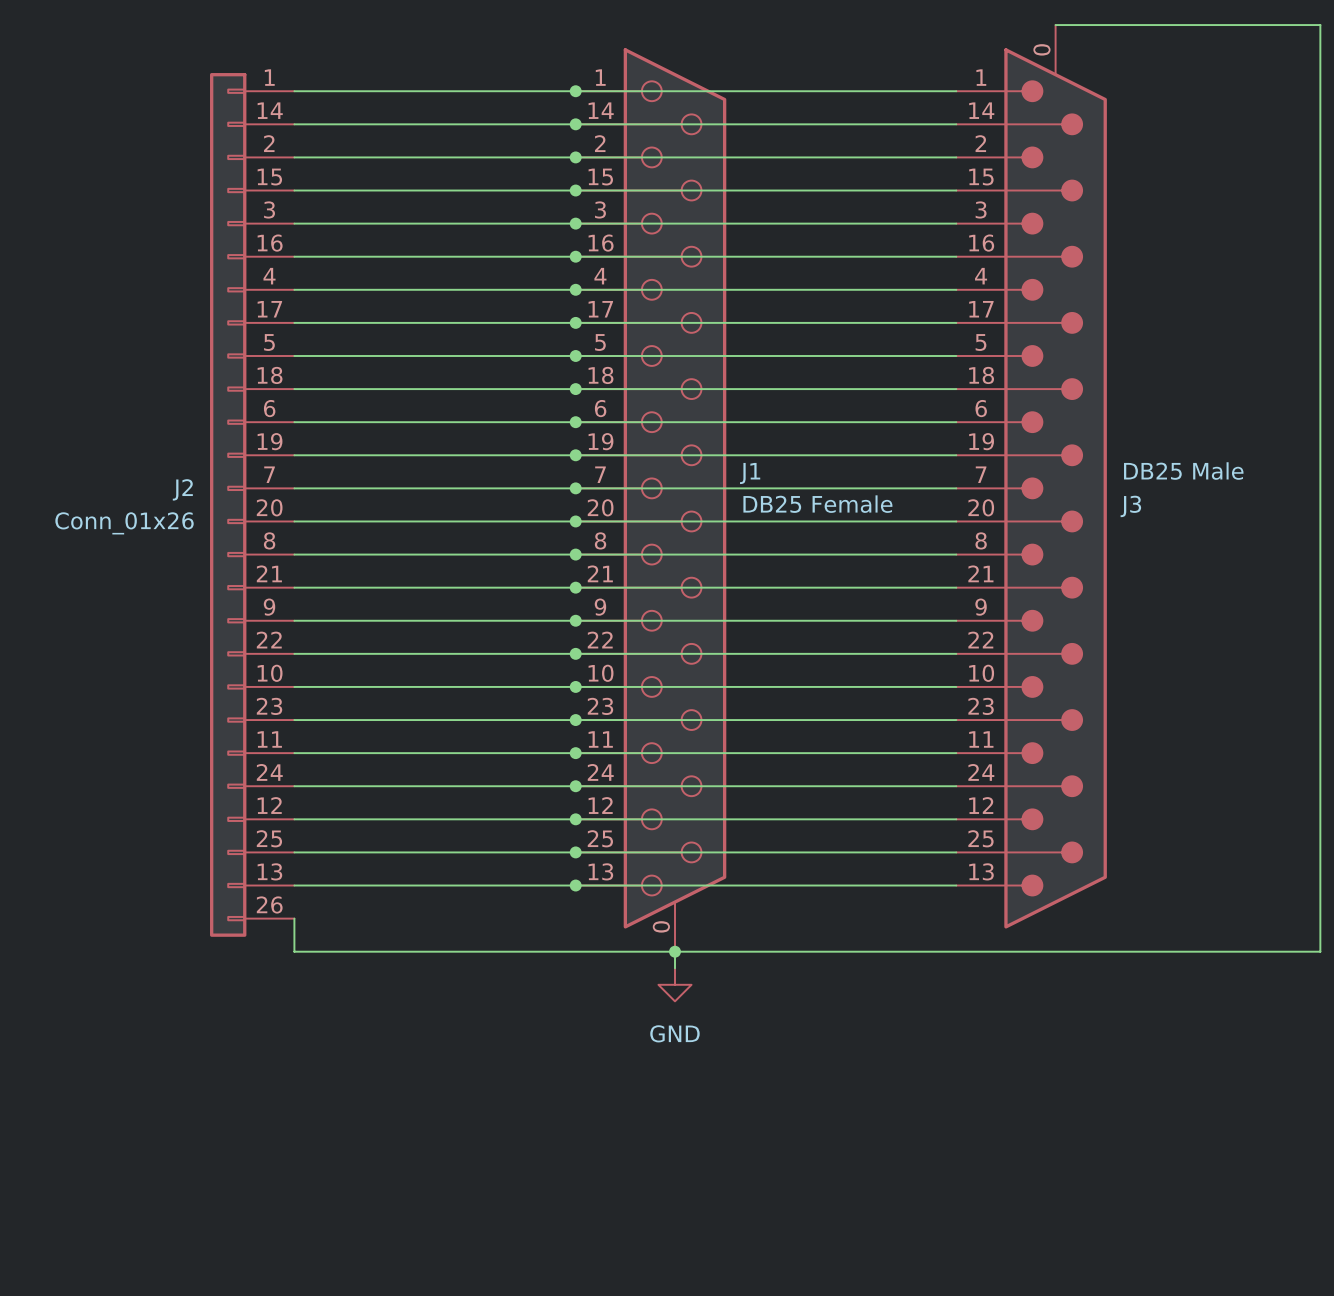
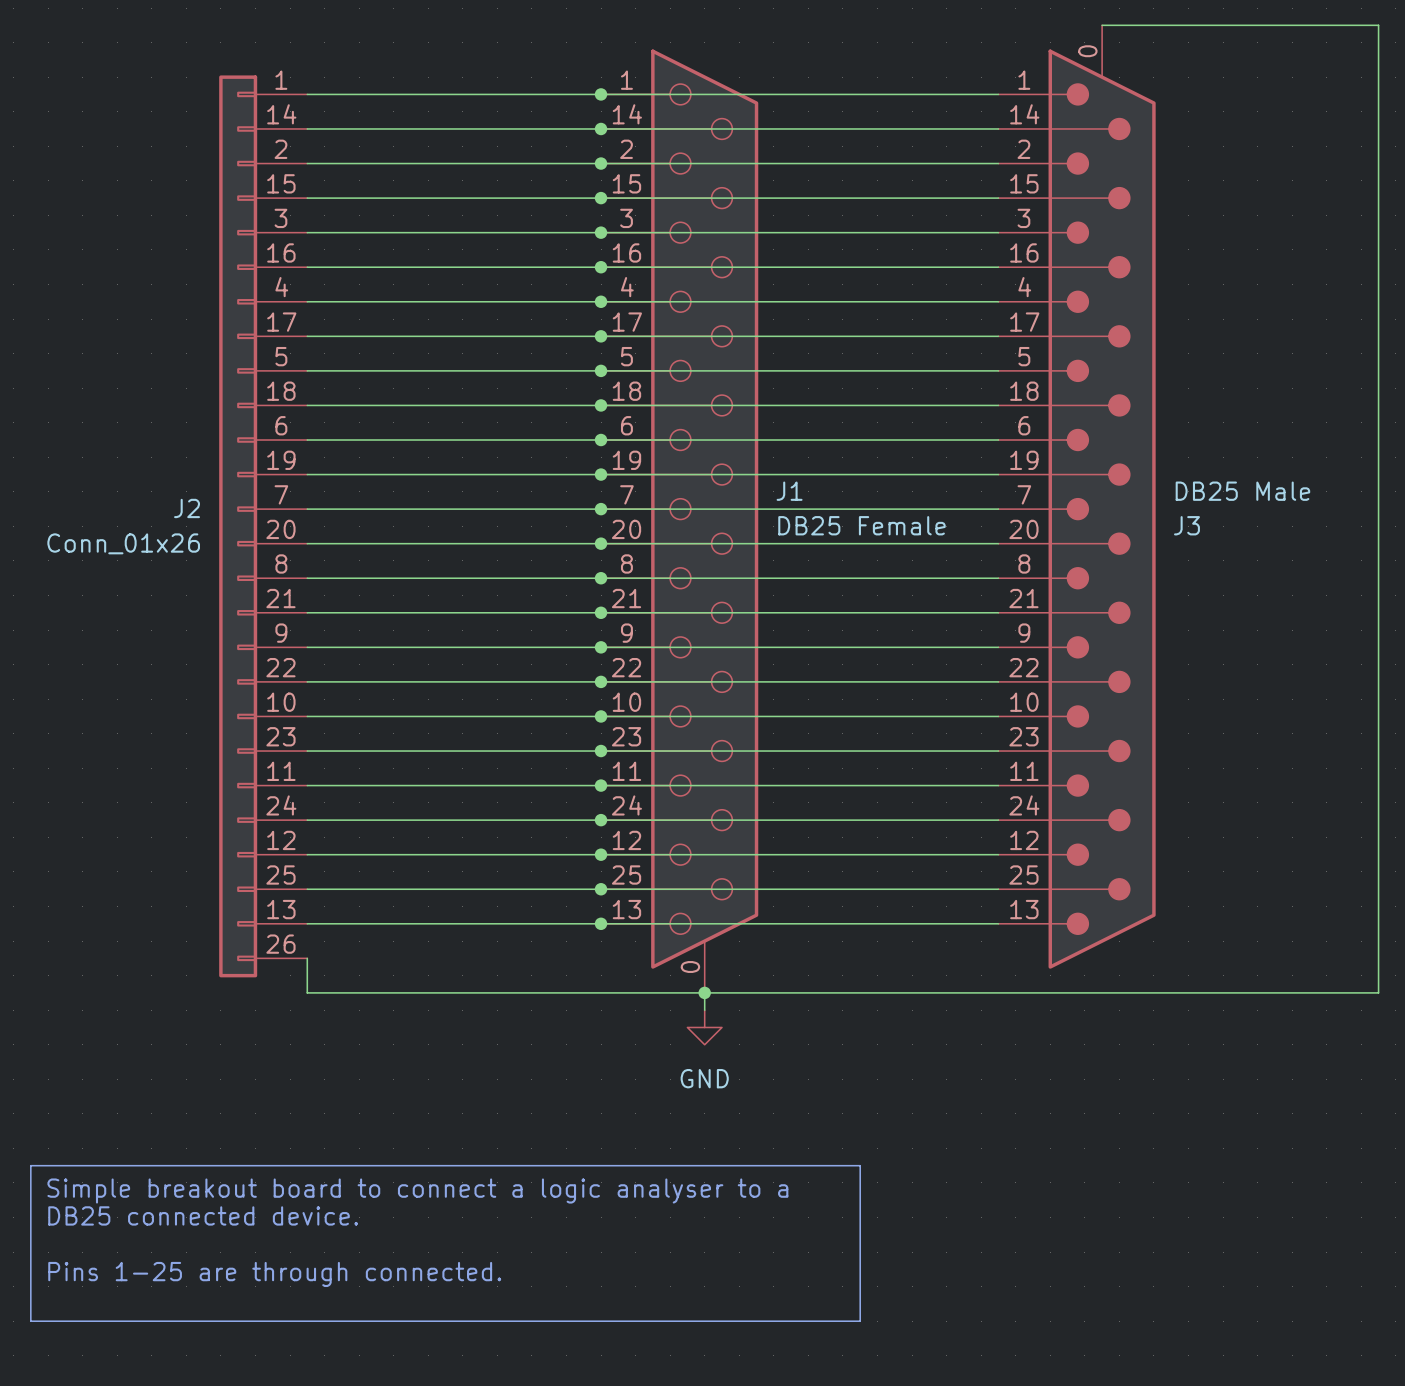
line: none -> (30, 1165) (860, 1165) (860, 1321) (30, 1321) (30, 1165)
text: none -> Simple breakout board to connect a logic analyser to a (417, 1191)
text: none -> DB25 connected device. (203, 1215)
text: none -> Pins 1-25 are through connected. (274, 1274)

